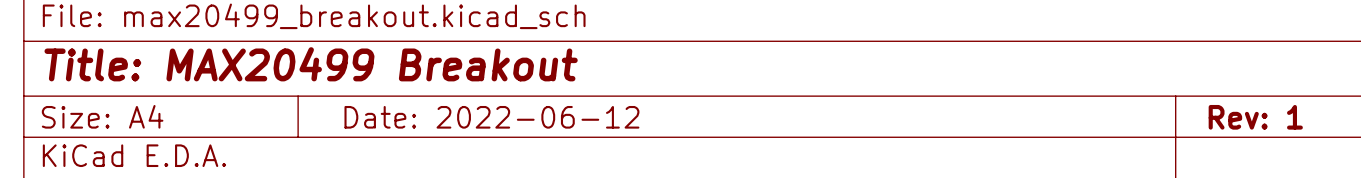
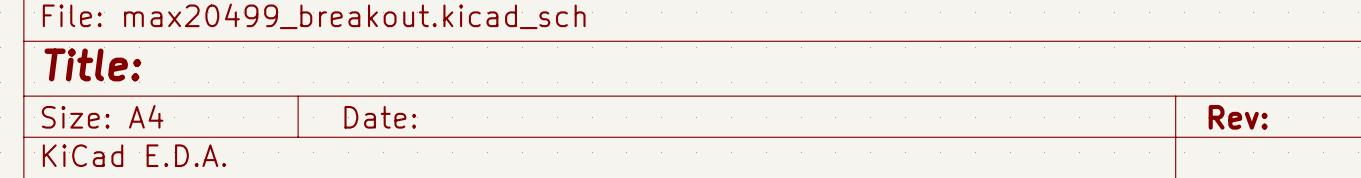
title block: Title: MAX20499 Breakout (311, 64) -> Title: (92, 64)
title block: Date: 2022-06-12 (491, 117) -> Date: (380, 117)
title block: Rev: 1 (1255, 117) -> Rev: (1238, 117)

